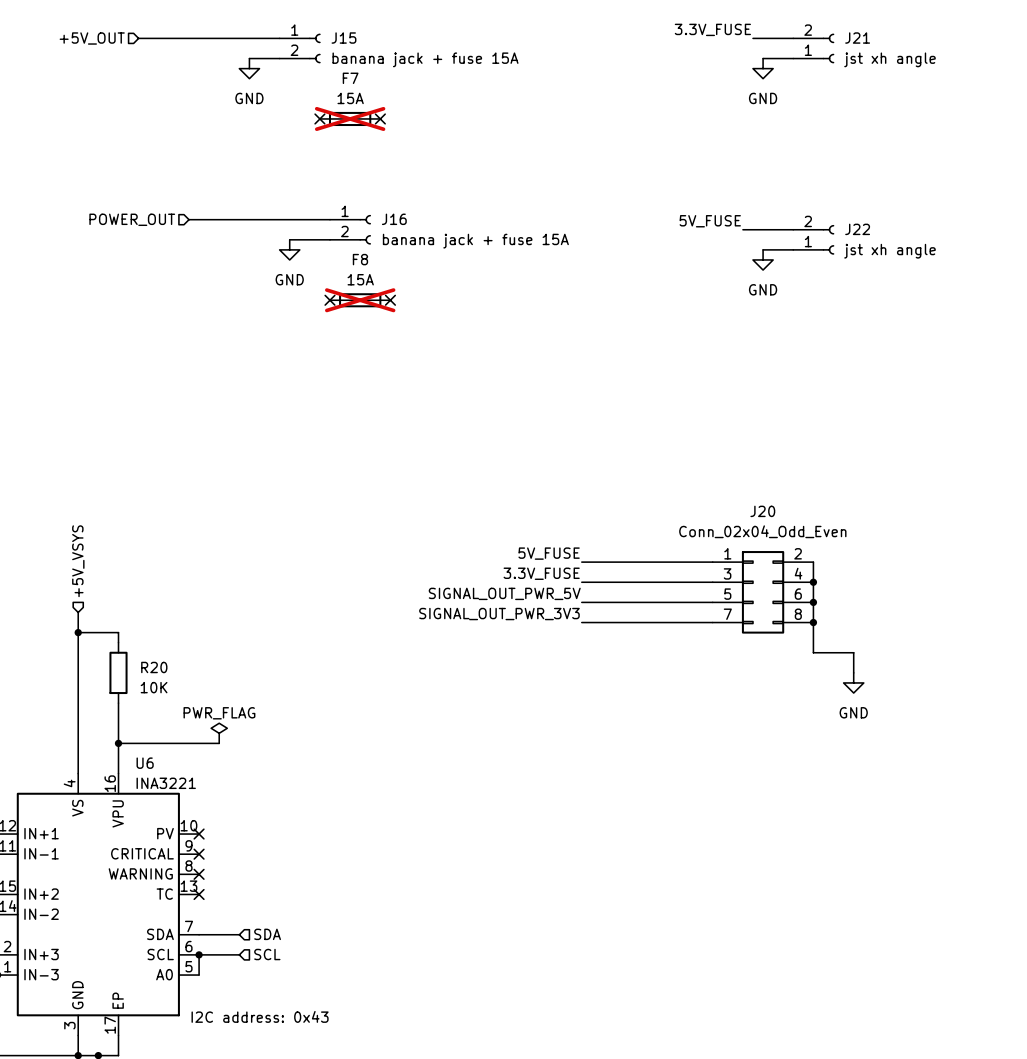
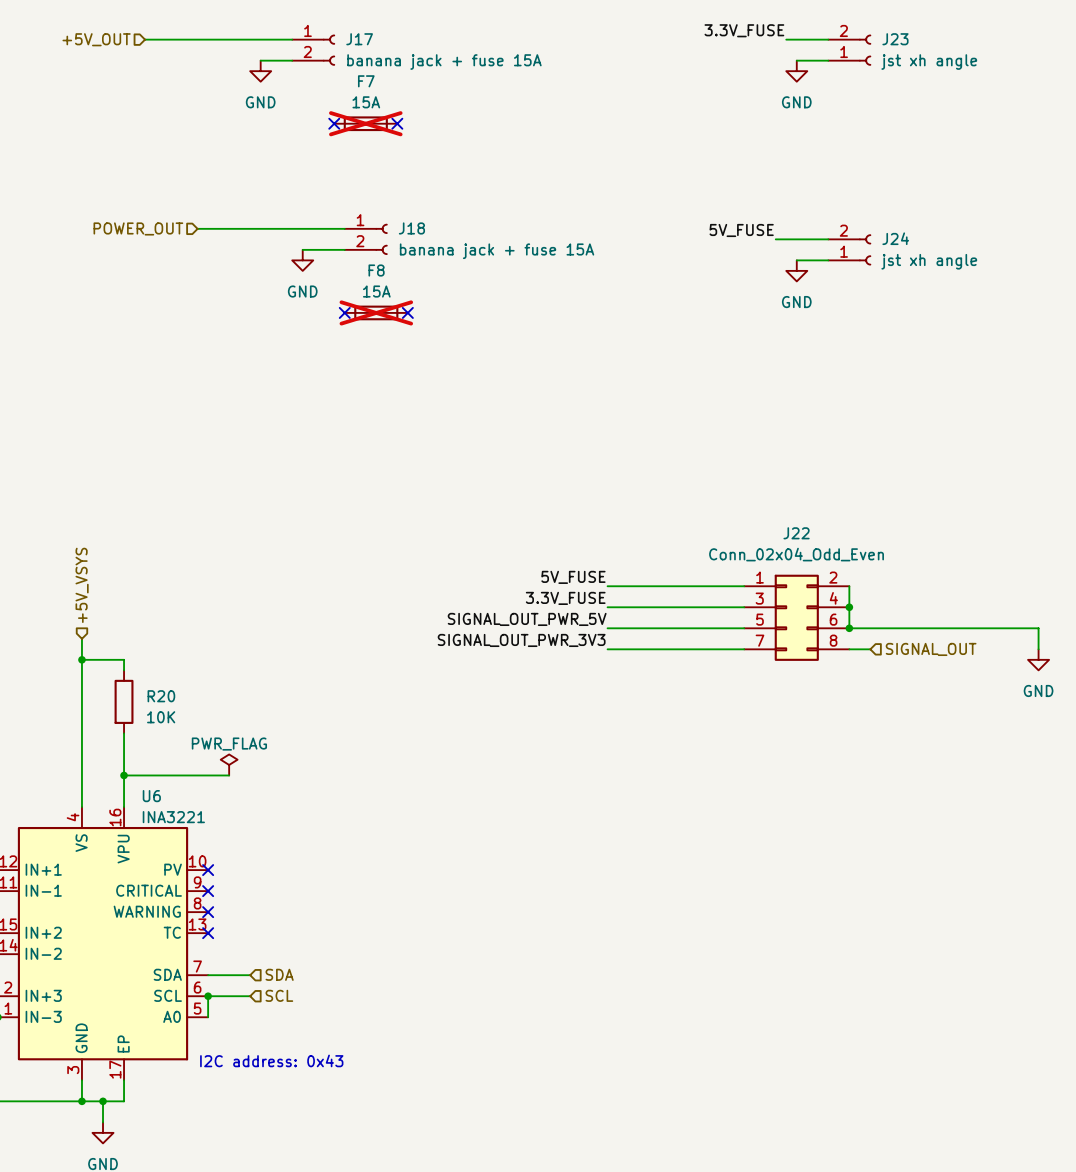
J15 name: J15 (343, 38) -> J17 (359, 39)
J21 name: J21 (857, 38) -> J23 (895, 39)
J16 name: J16 (394, 219) -> J18 (411, 228)
J22 name: J22 (857, 229) -> J24 (895, 238)
J20 name: J20 (762, 511) -> J22 (796, 533)
wire: (813, 602) (813, 652) (853, 652) (853, 672) -> (849, 628) (1038, 628) (1038, 649)
wire: none -> (849, 649) (870, 649)
junction: (813, 622) -> none
hierarchical label: none -> SIGNAL_OUT (931, 649)
power symbol position: GND (853, 682) -> GND (1038, 659)

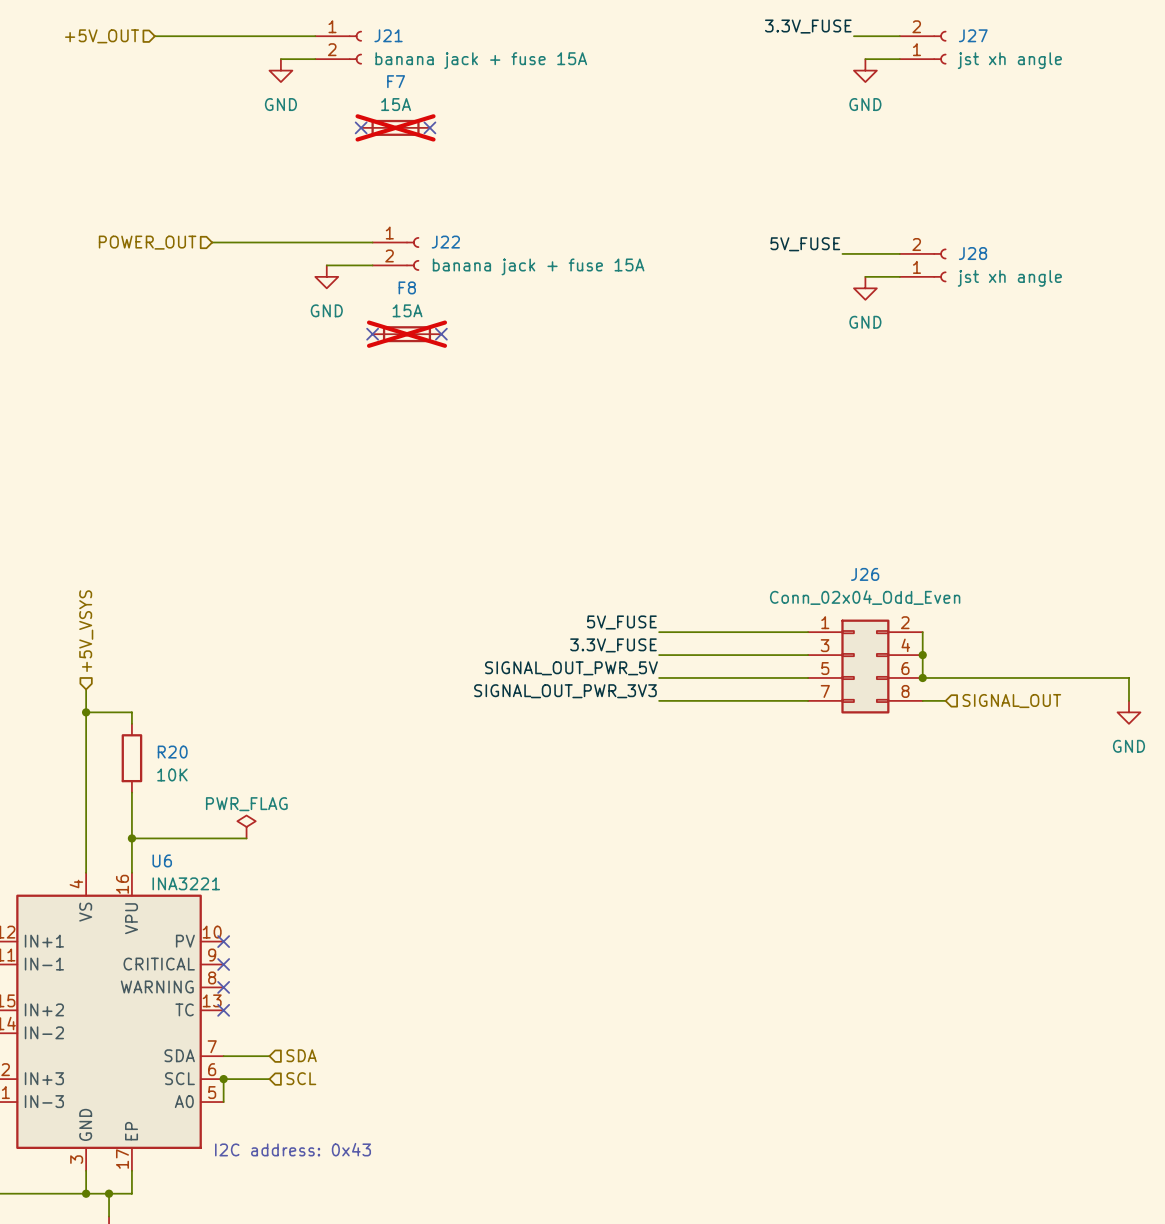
J17 name: J17 (359, 39) -> J21 (388, 35)
J23 name: J23 (895, 39) -> J27 (973, 35)
J18 name: J18 (411, 228) -> J22 (445, 242)
J24 name: J24 (895, 238) -> J28 (973, 253)
J22 name: J22 (796, 533) -> J26 (865, 574)

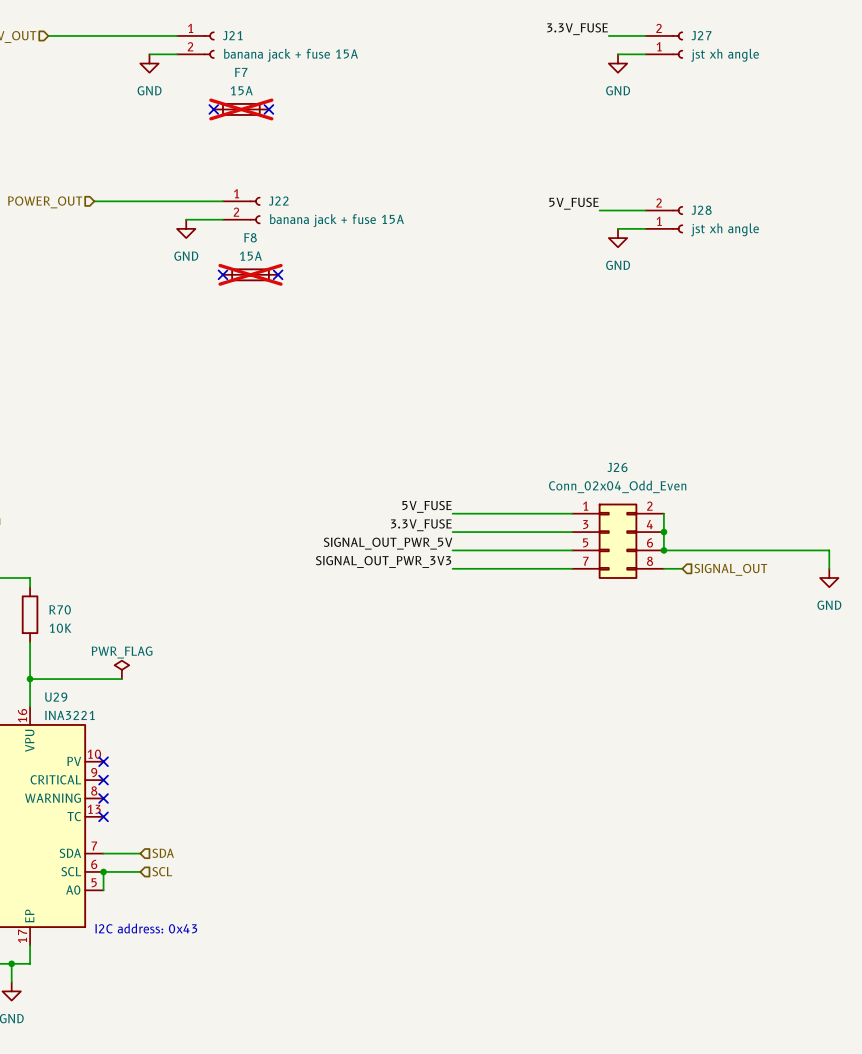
R20 name: R20 (172, 752) -> R70 (60, 609)
U6 name: U6 (162, 860) -> U29 (56, 697)

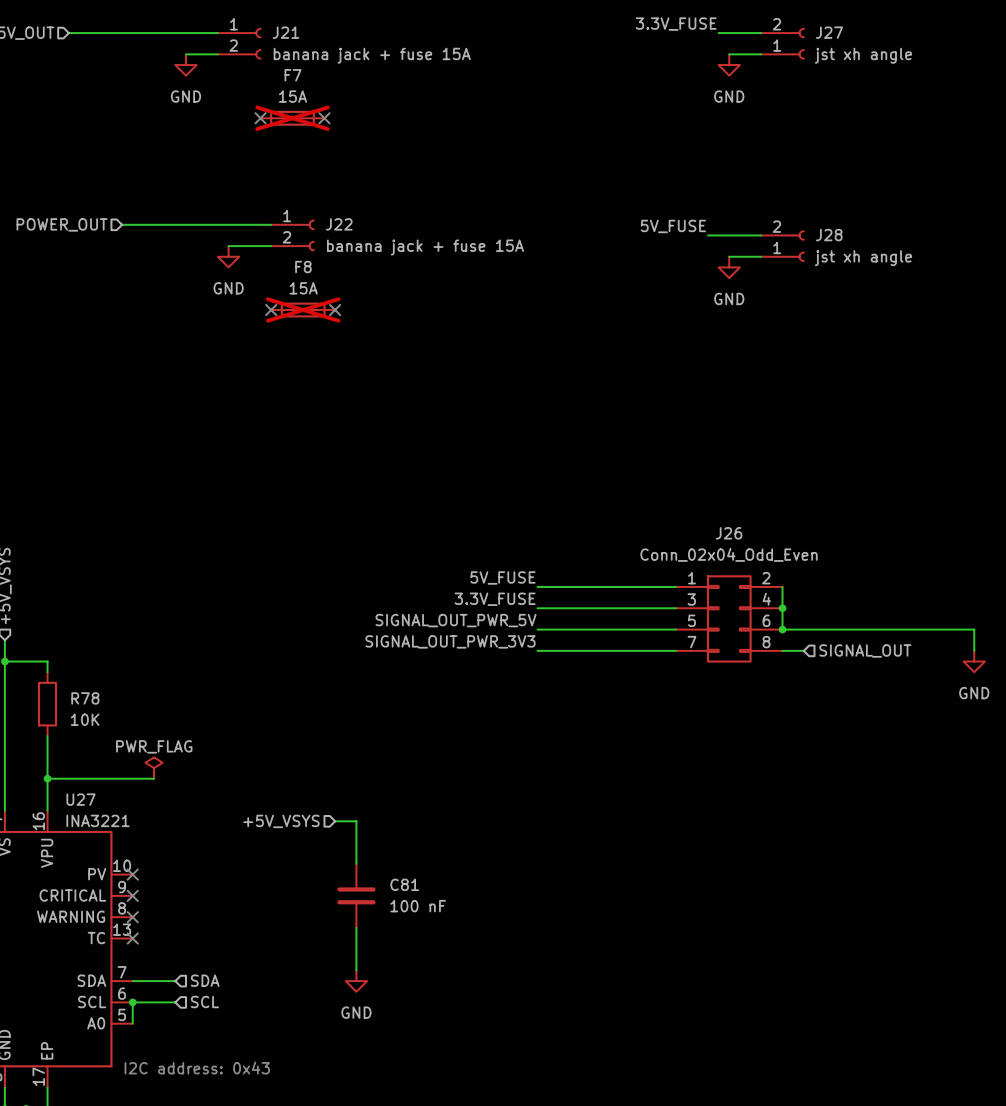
R70 name: R70 (60, 609) -> R78 (85, 698)
U29 name: U29 (56, 697) -> U27 (81, 799)
wire: none -> (335, 821) (356, 821) (356, 863)
hierarchical label: none -> +5V_VSYS (281, 821)
C81: none -> 100 nF (356, 895)
wire: none -> (356, 927) (356, 970)
power symbol: none -> GND (356, 981)

